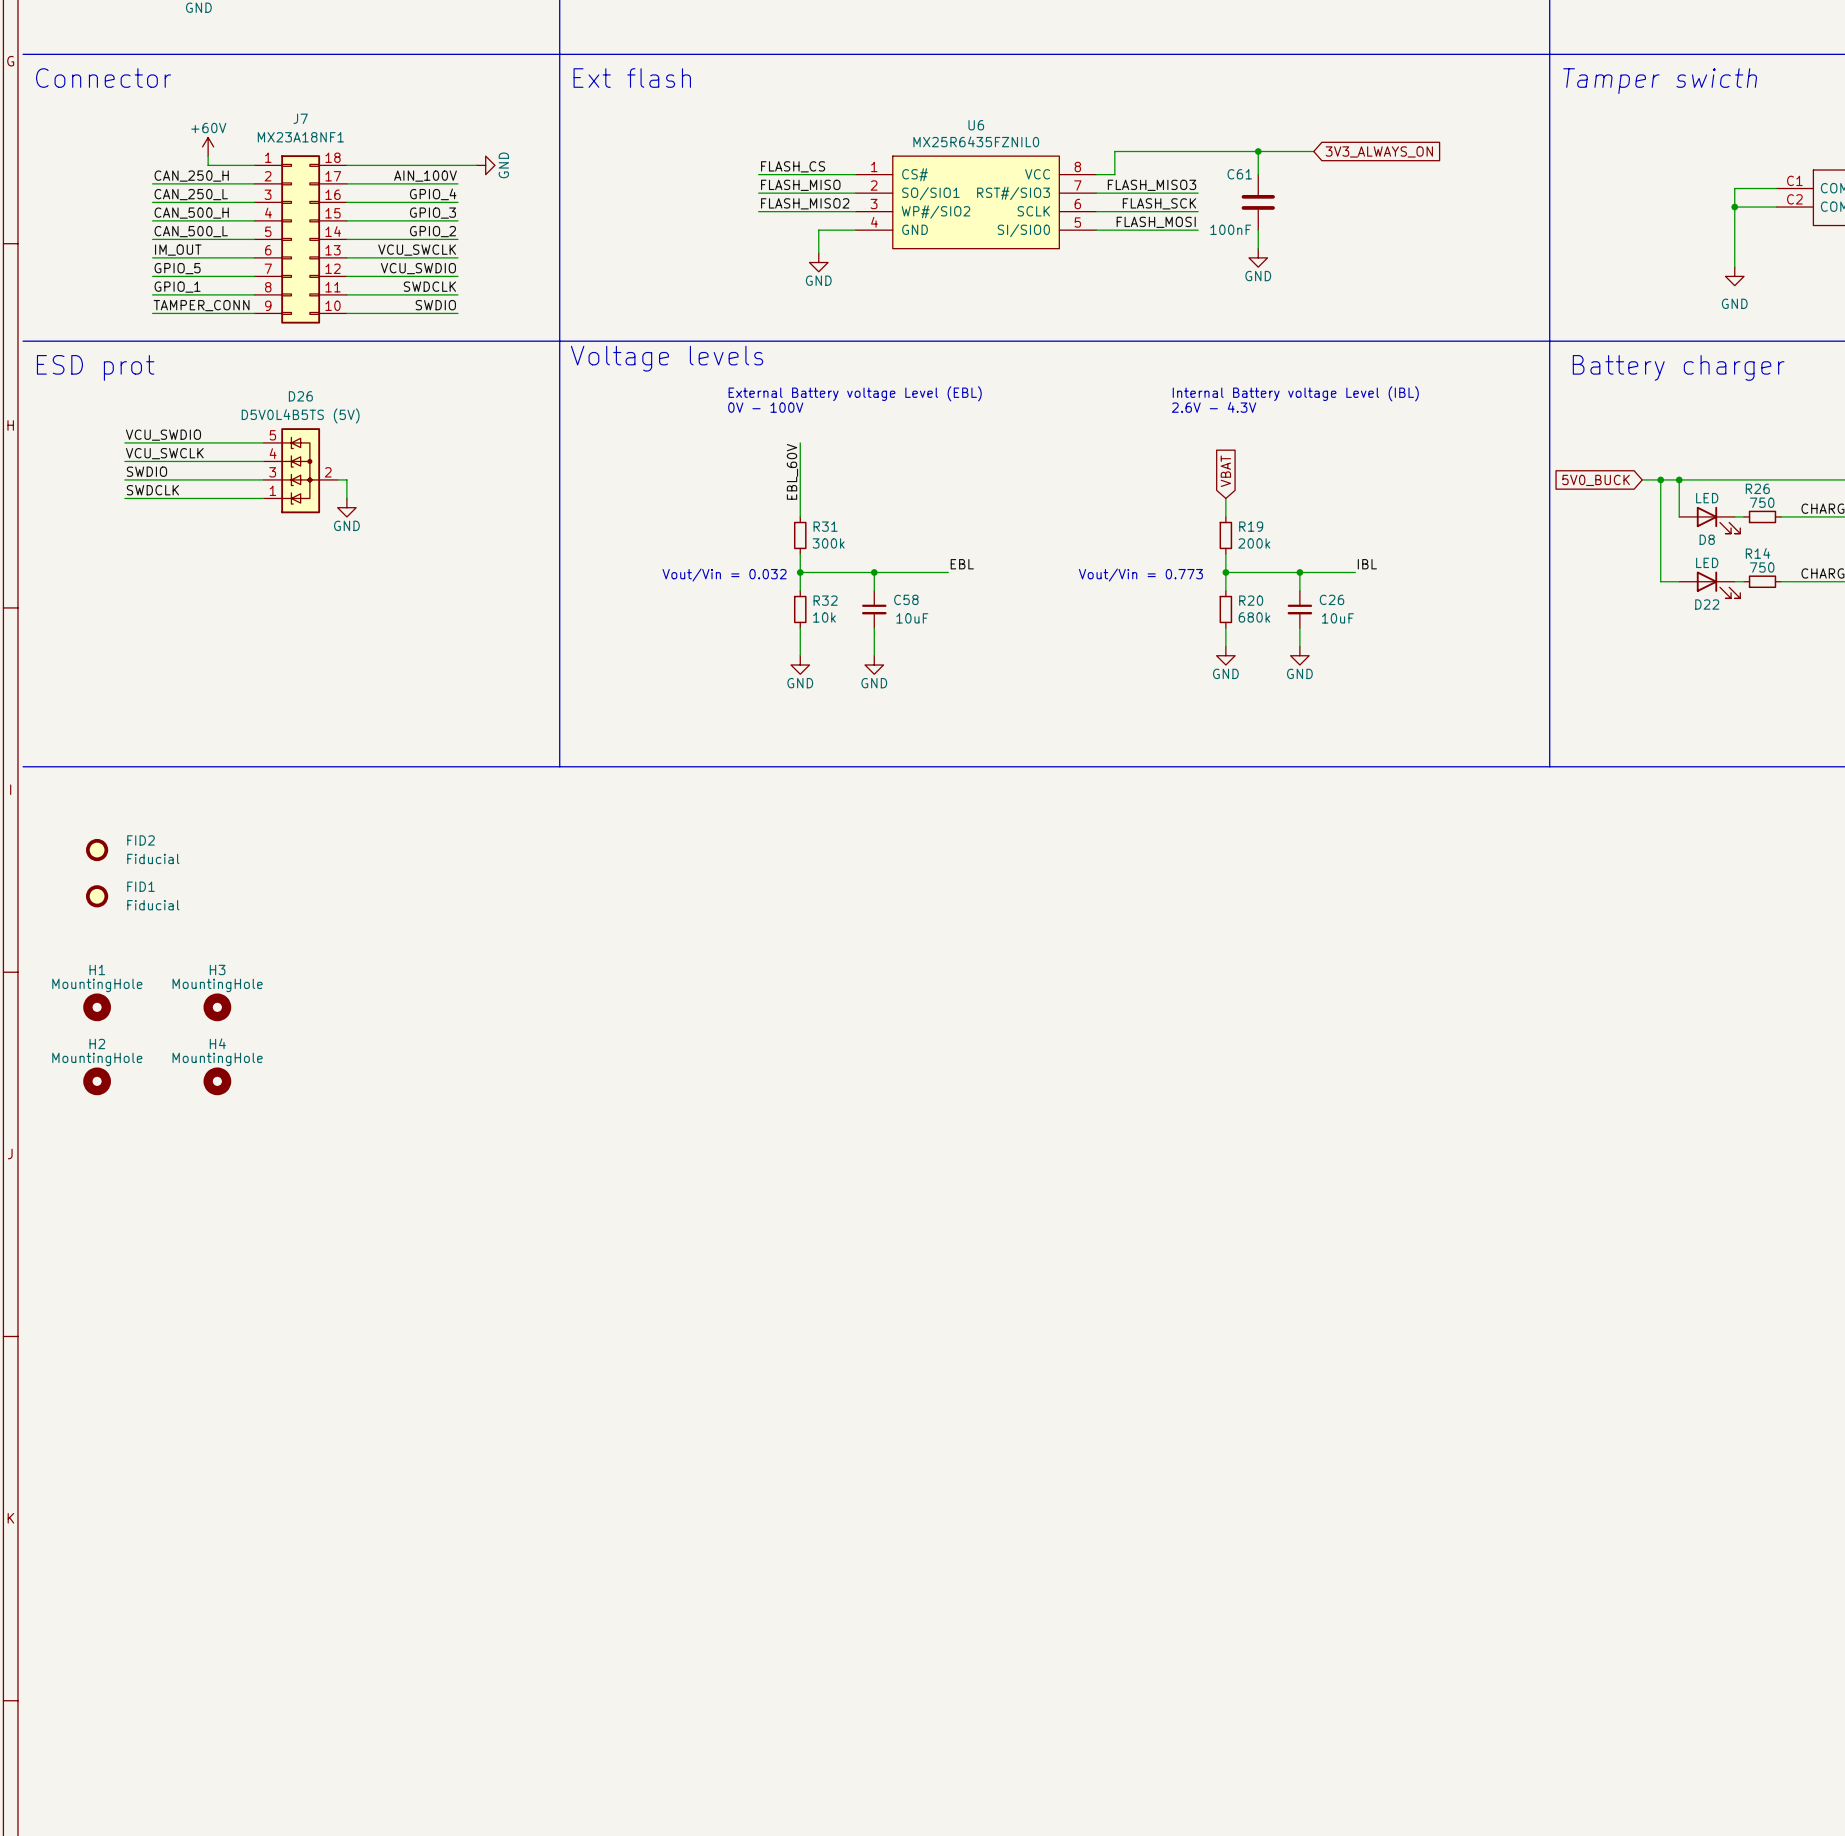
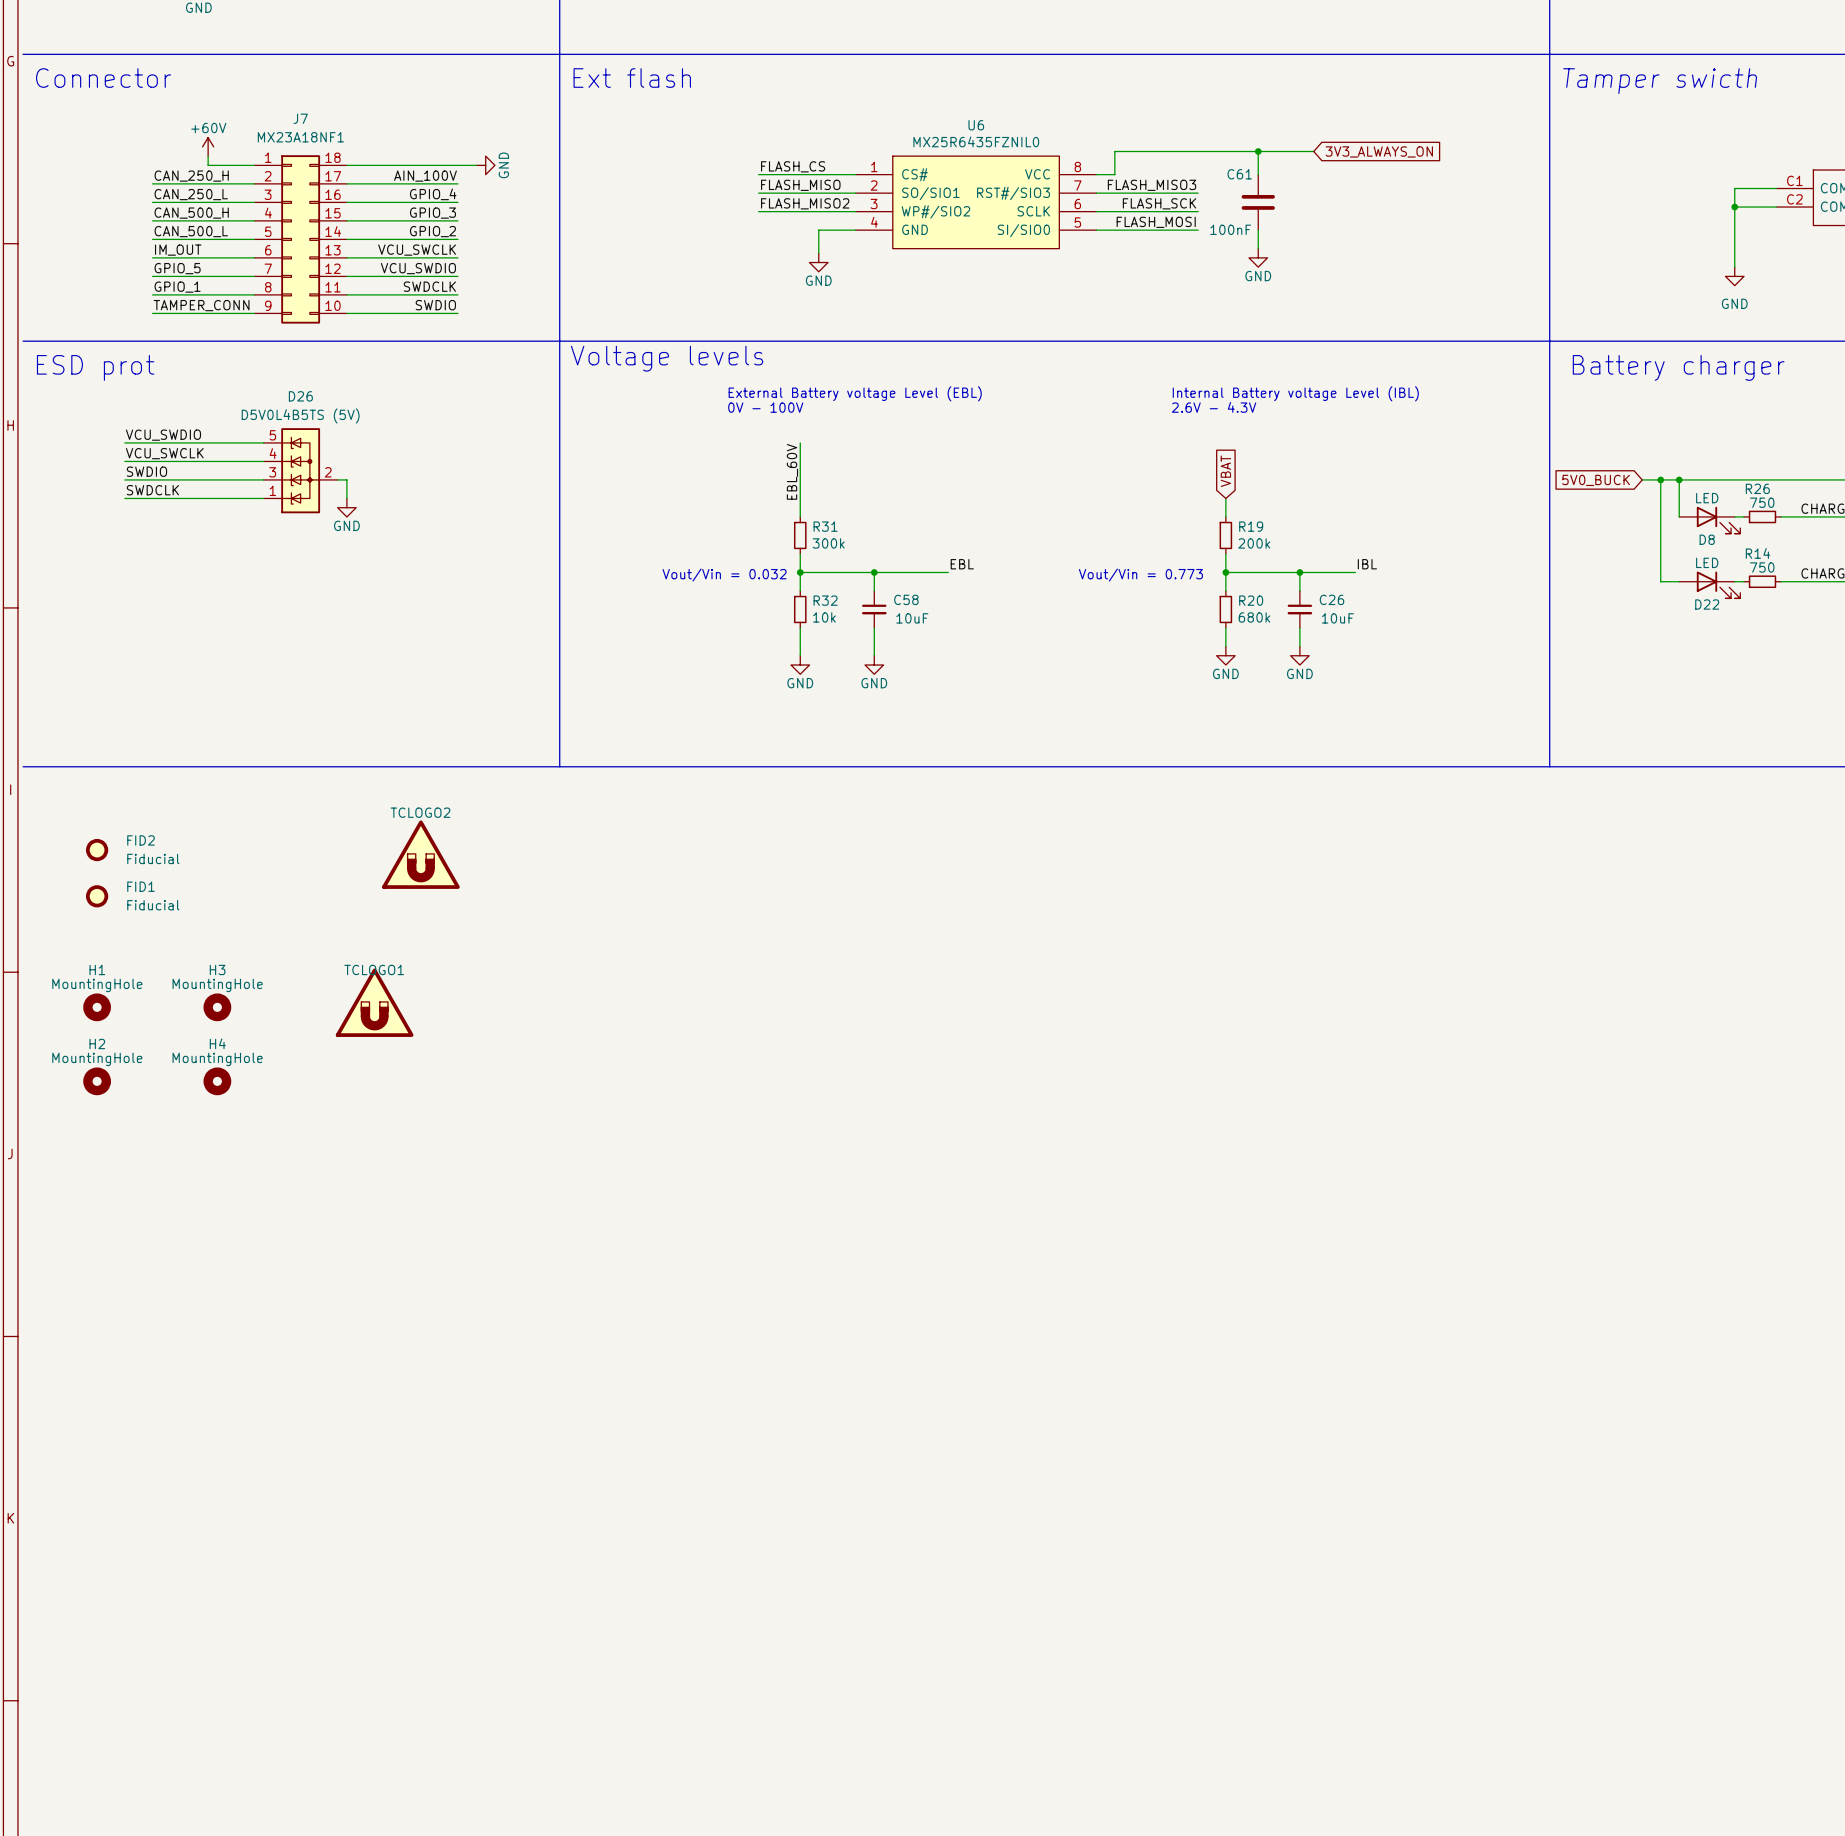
TCLOGO2: none -> (420, 854)
TCLOGO1: none -> (374, 1002)

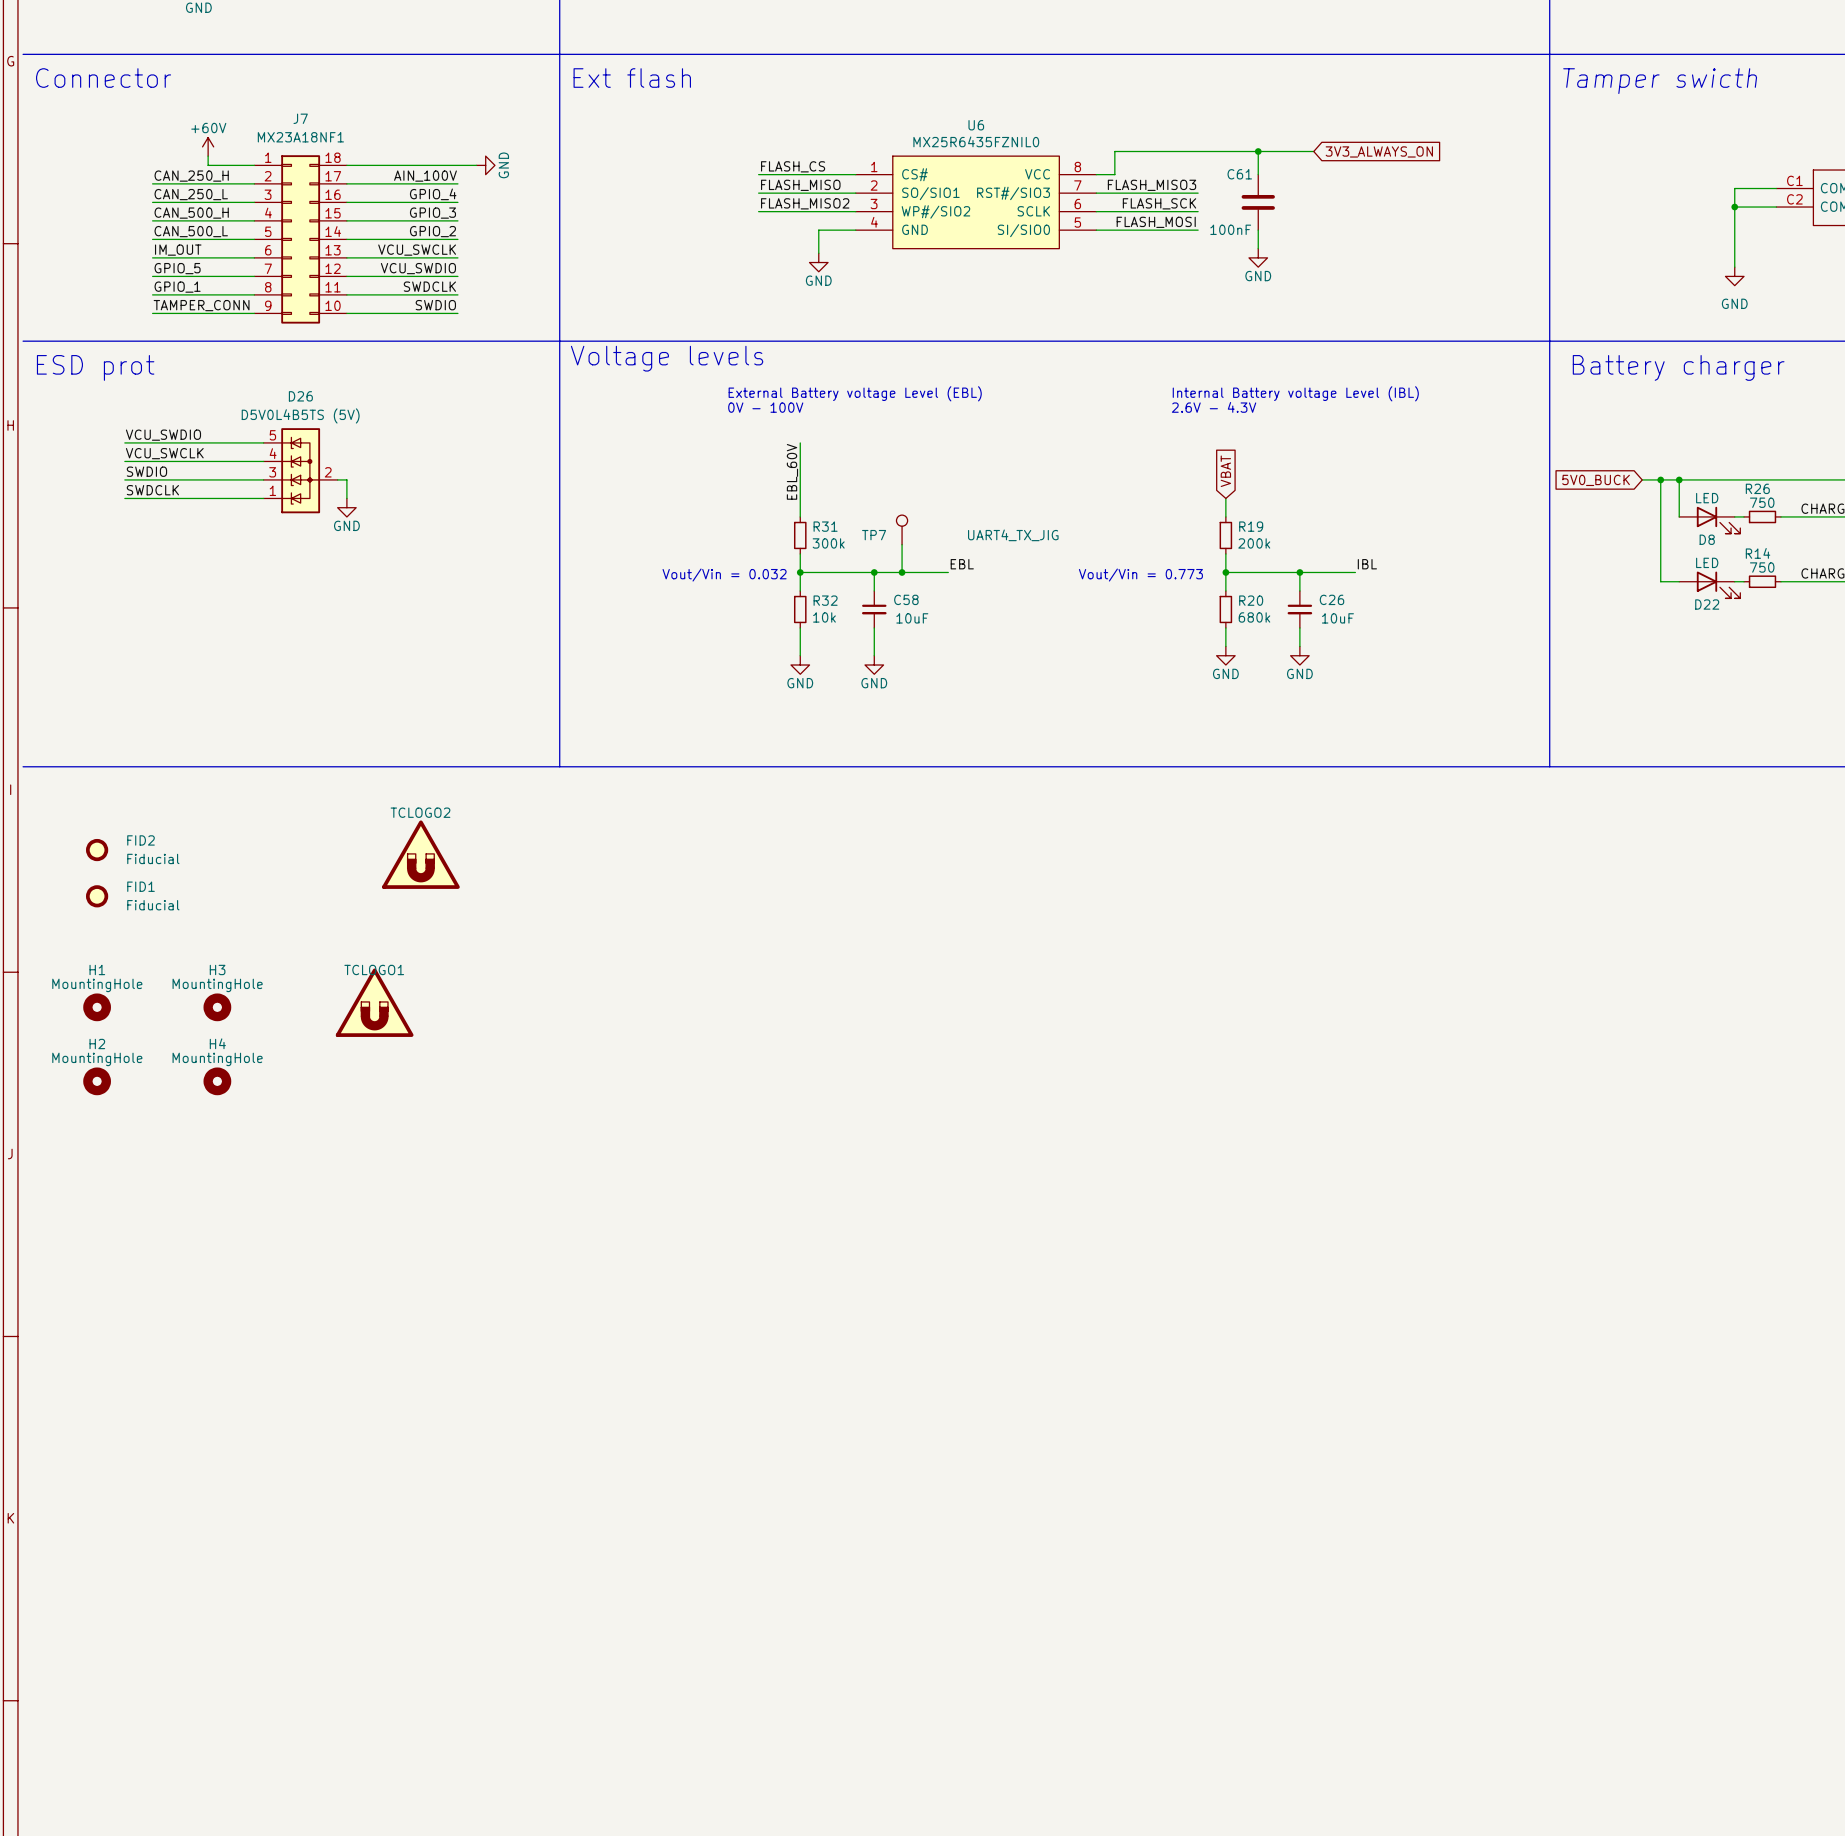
TP7: none -> UART4_TX_JIG (902, 529)
wire: none -> (902, 544) (902, 572)
junction: none -> (902, 572)

